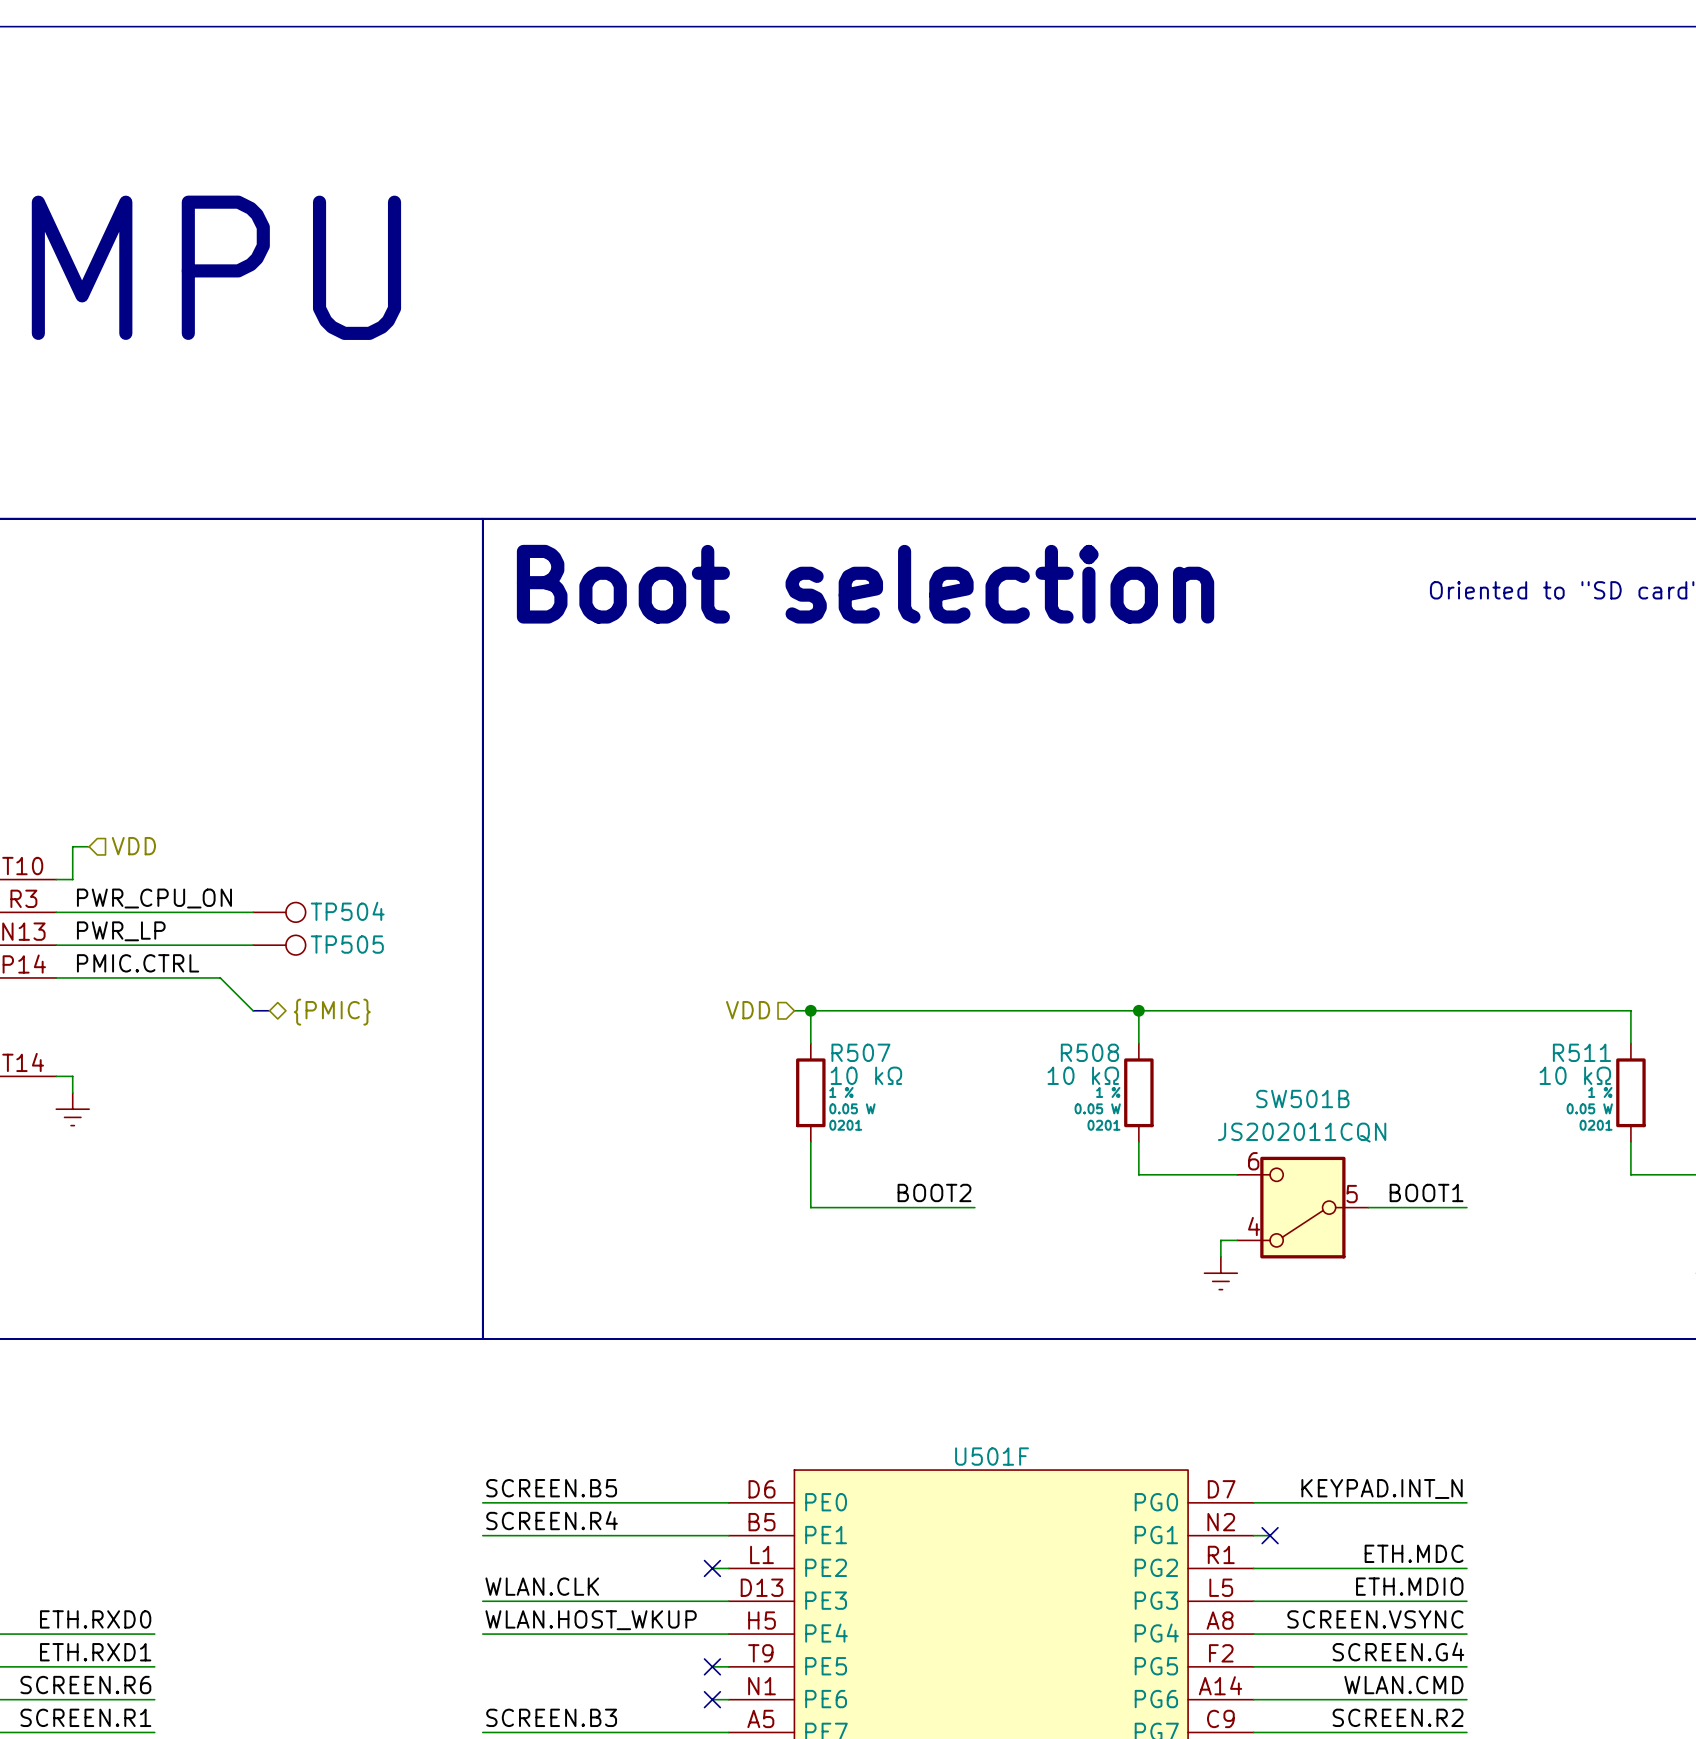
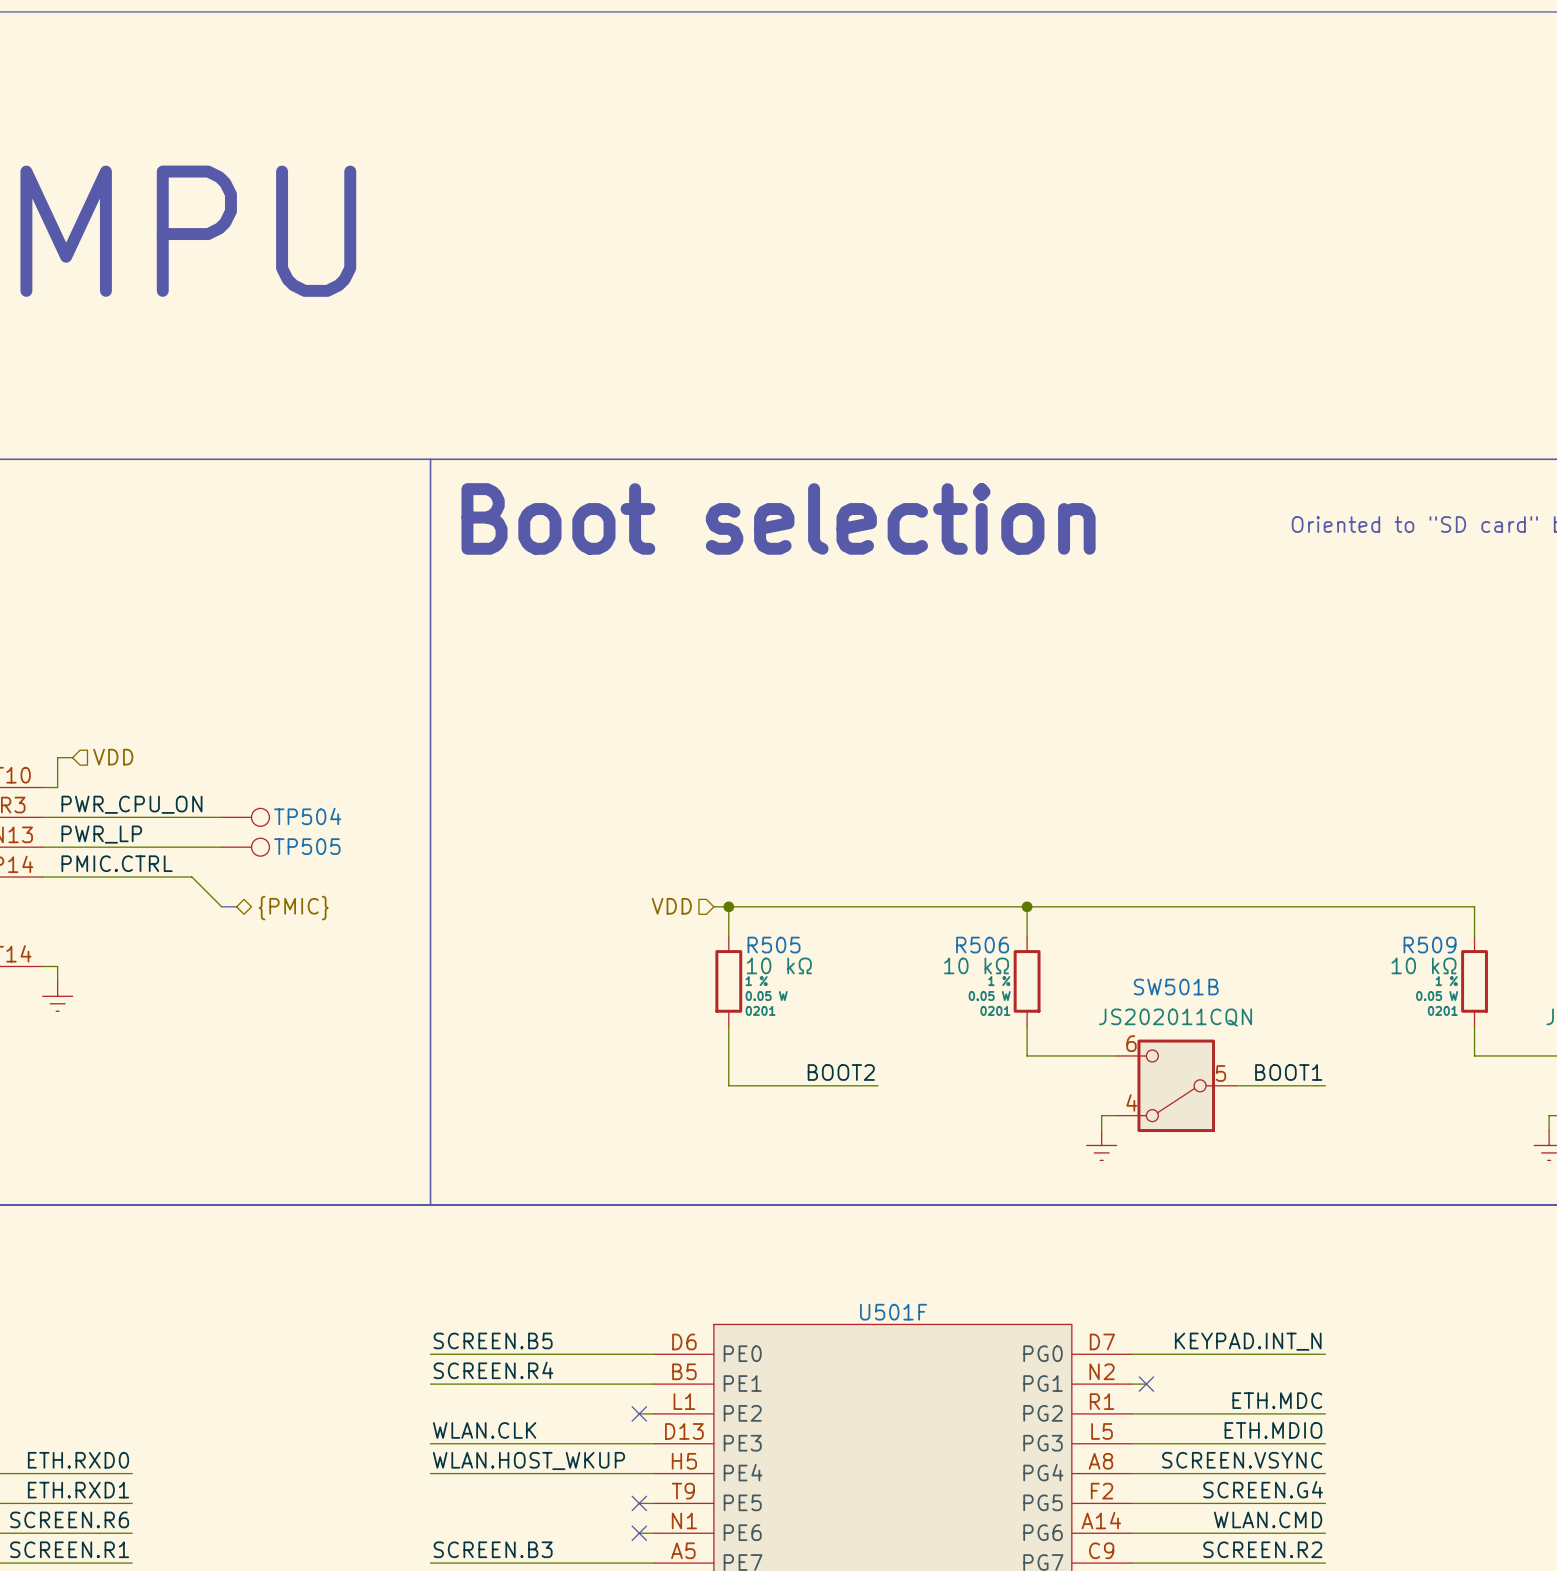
R507 name: R507 (860, 1052) -> R505 (774, 945)
R508 name: R508 (1089, 1052) -> R506 (982, 945)
R511 name: R511 (1581, 1052) -> R509 (1430, 945)

